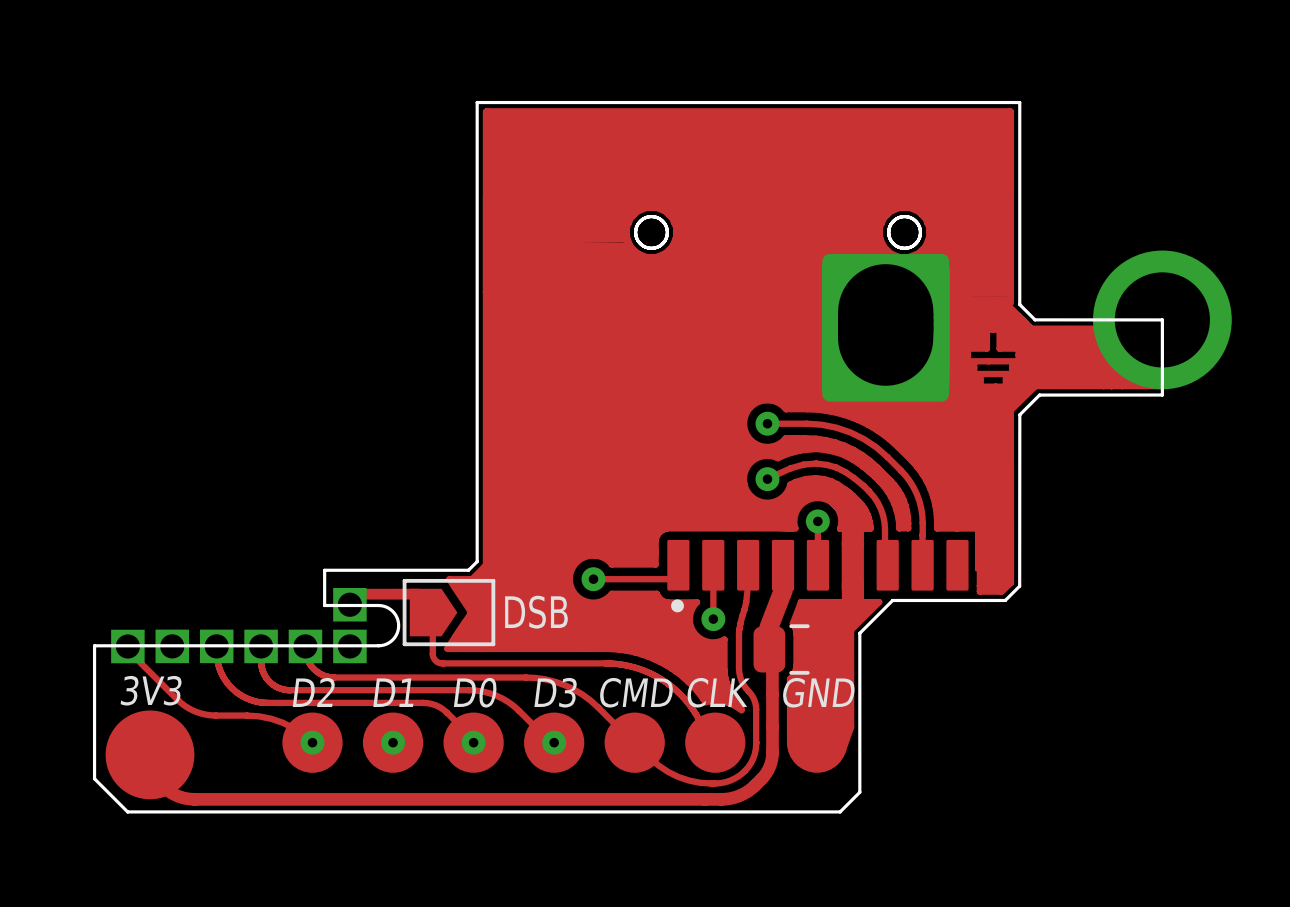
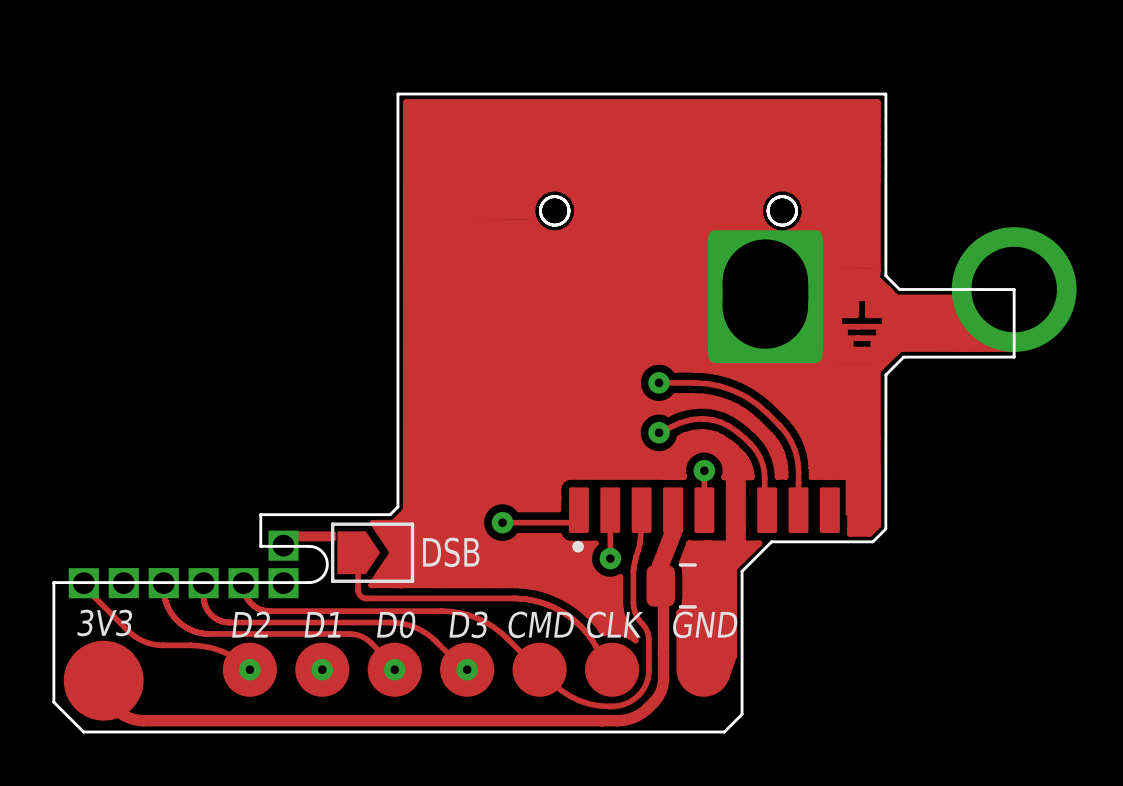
track: none -> (291, 534) (333, 534) (333, 538) (291, 538)
track: (363, 594) (418, 594) -> none

